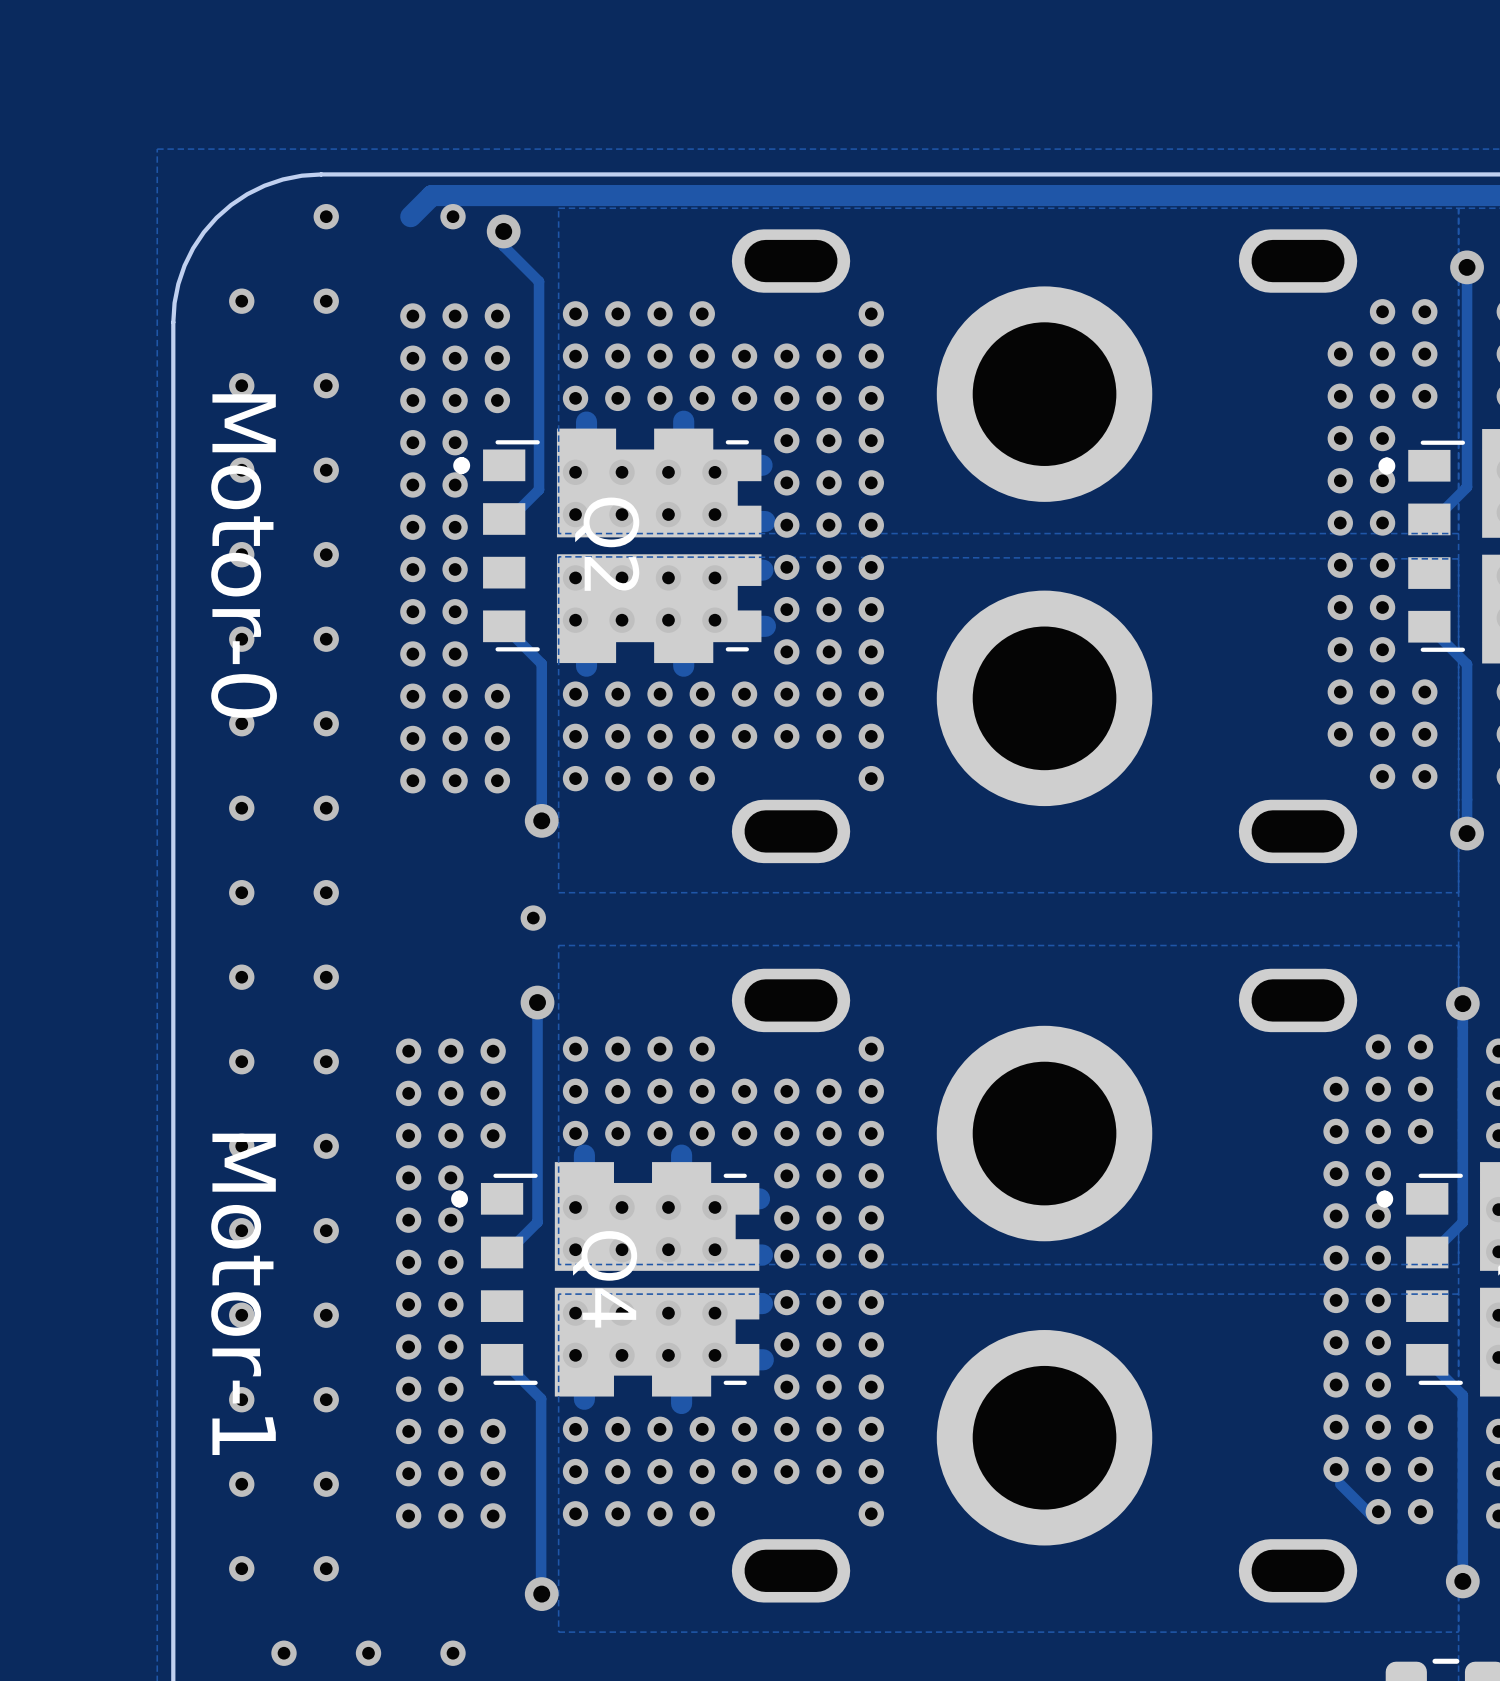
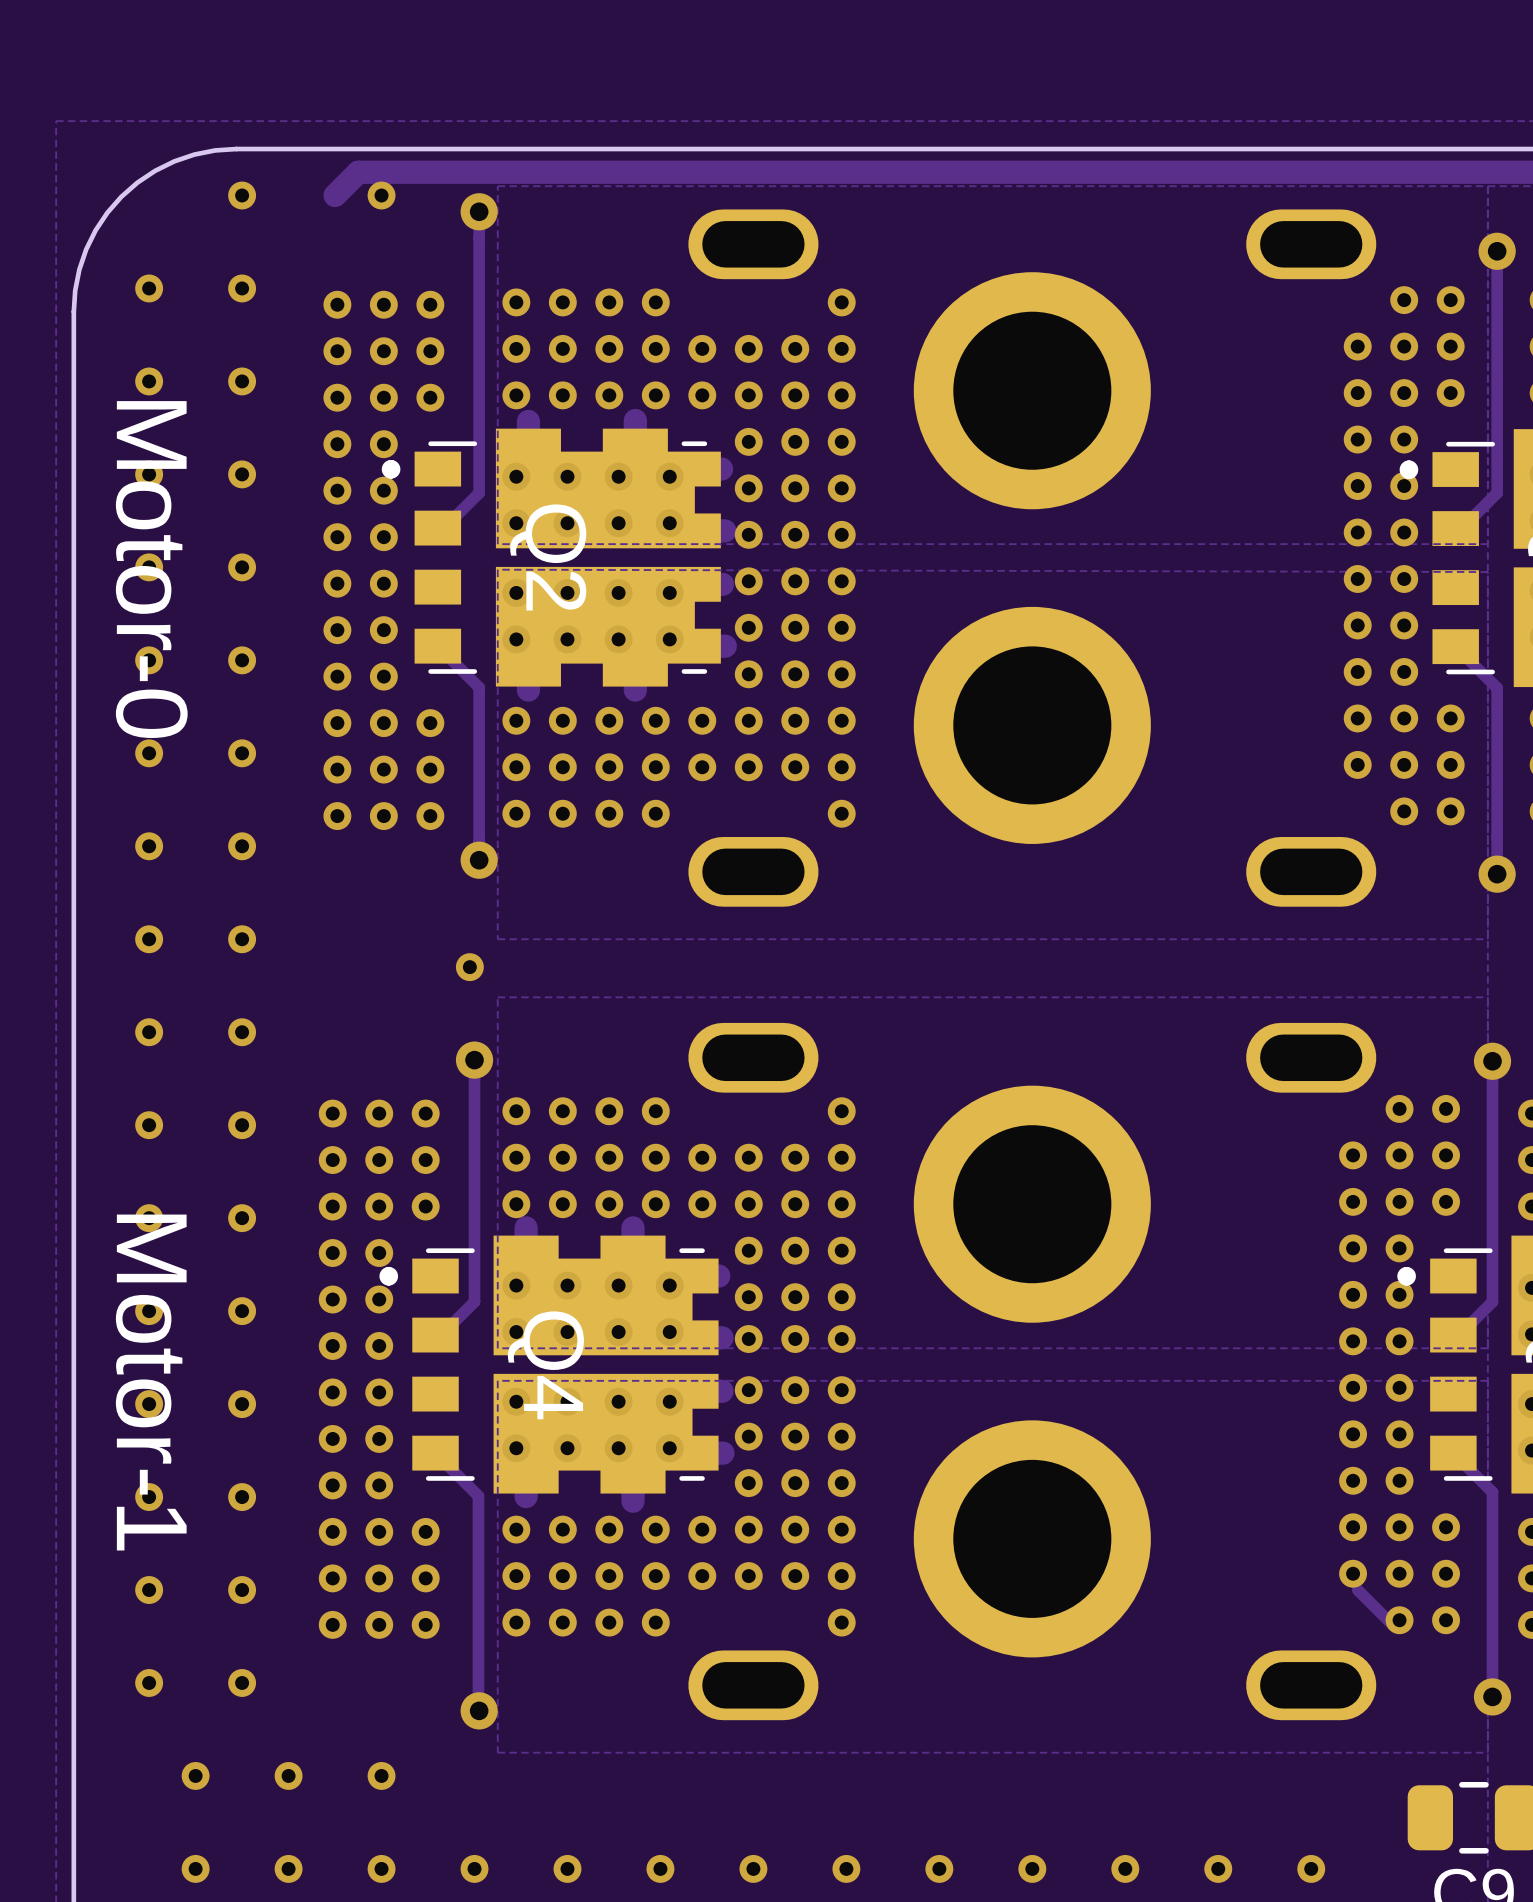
track: (503, 231) (503, 246) (539, 281) (539, 489) -> (479, 211) (479, 493) (476, 495)
via position: (503, 231) -> (479, 211)

